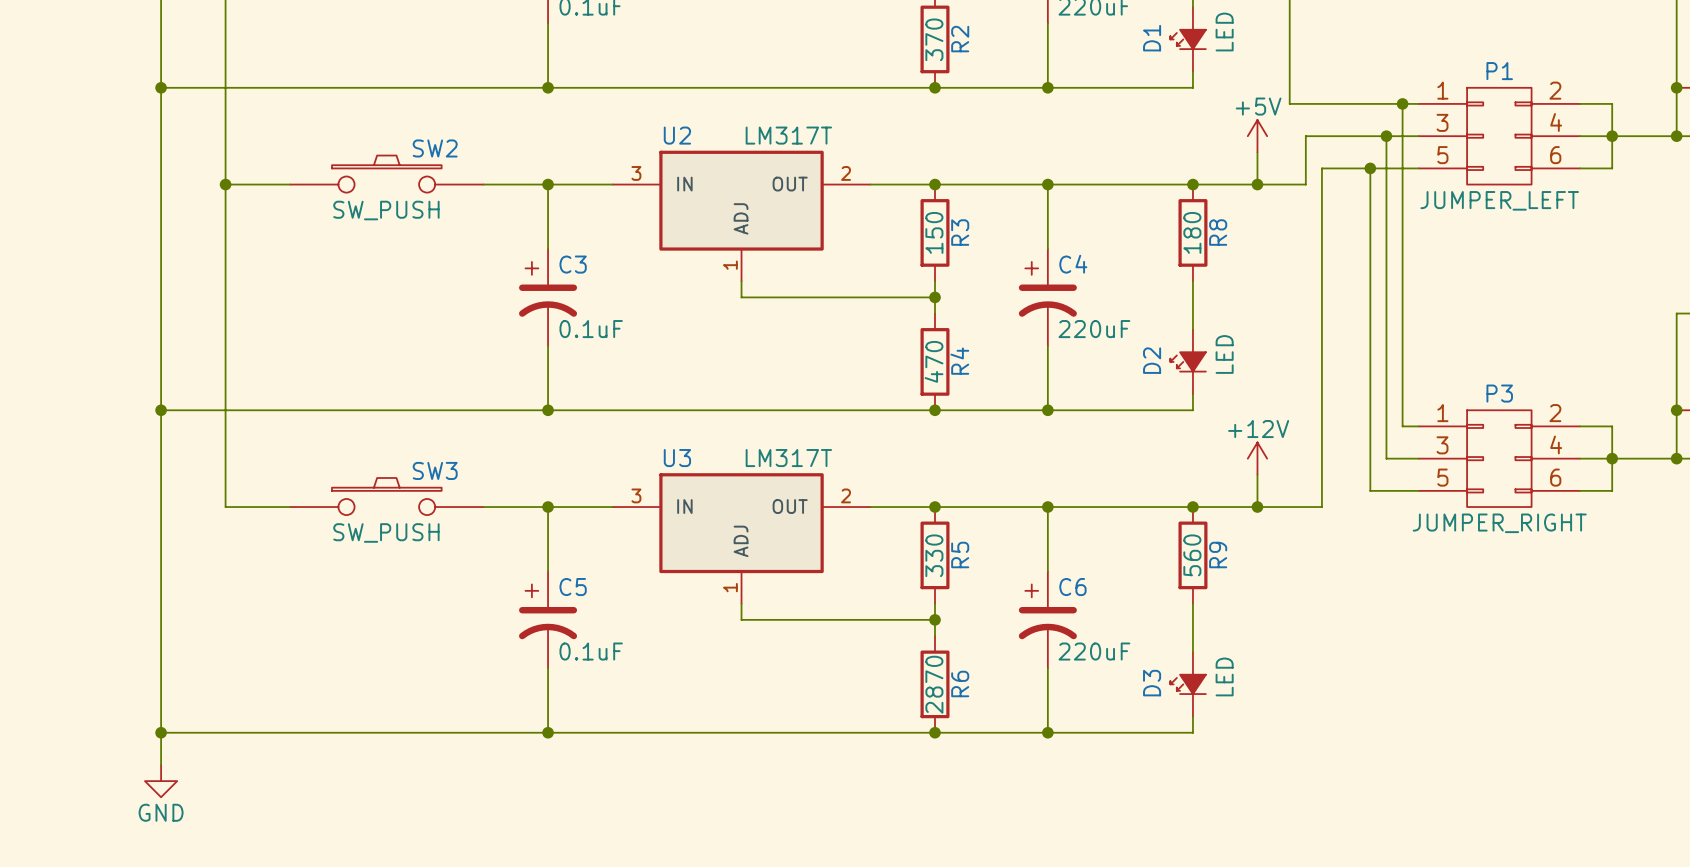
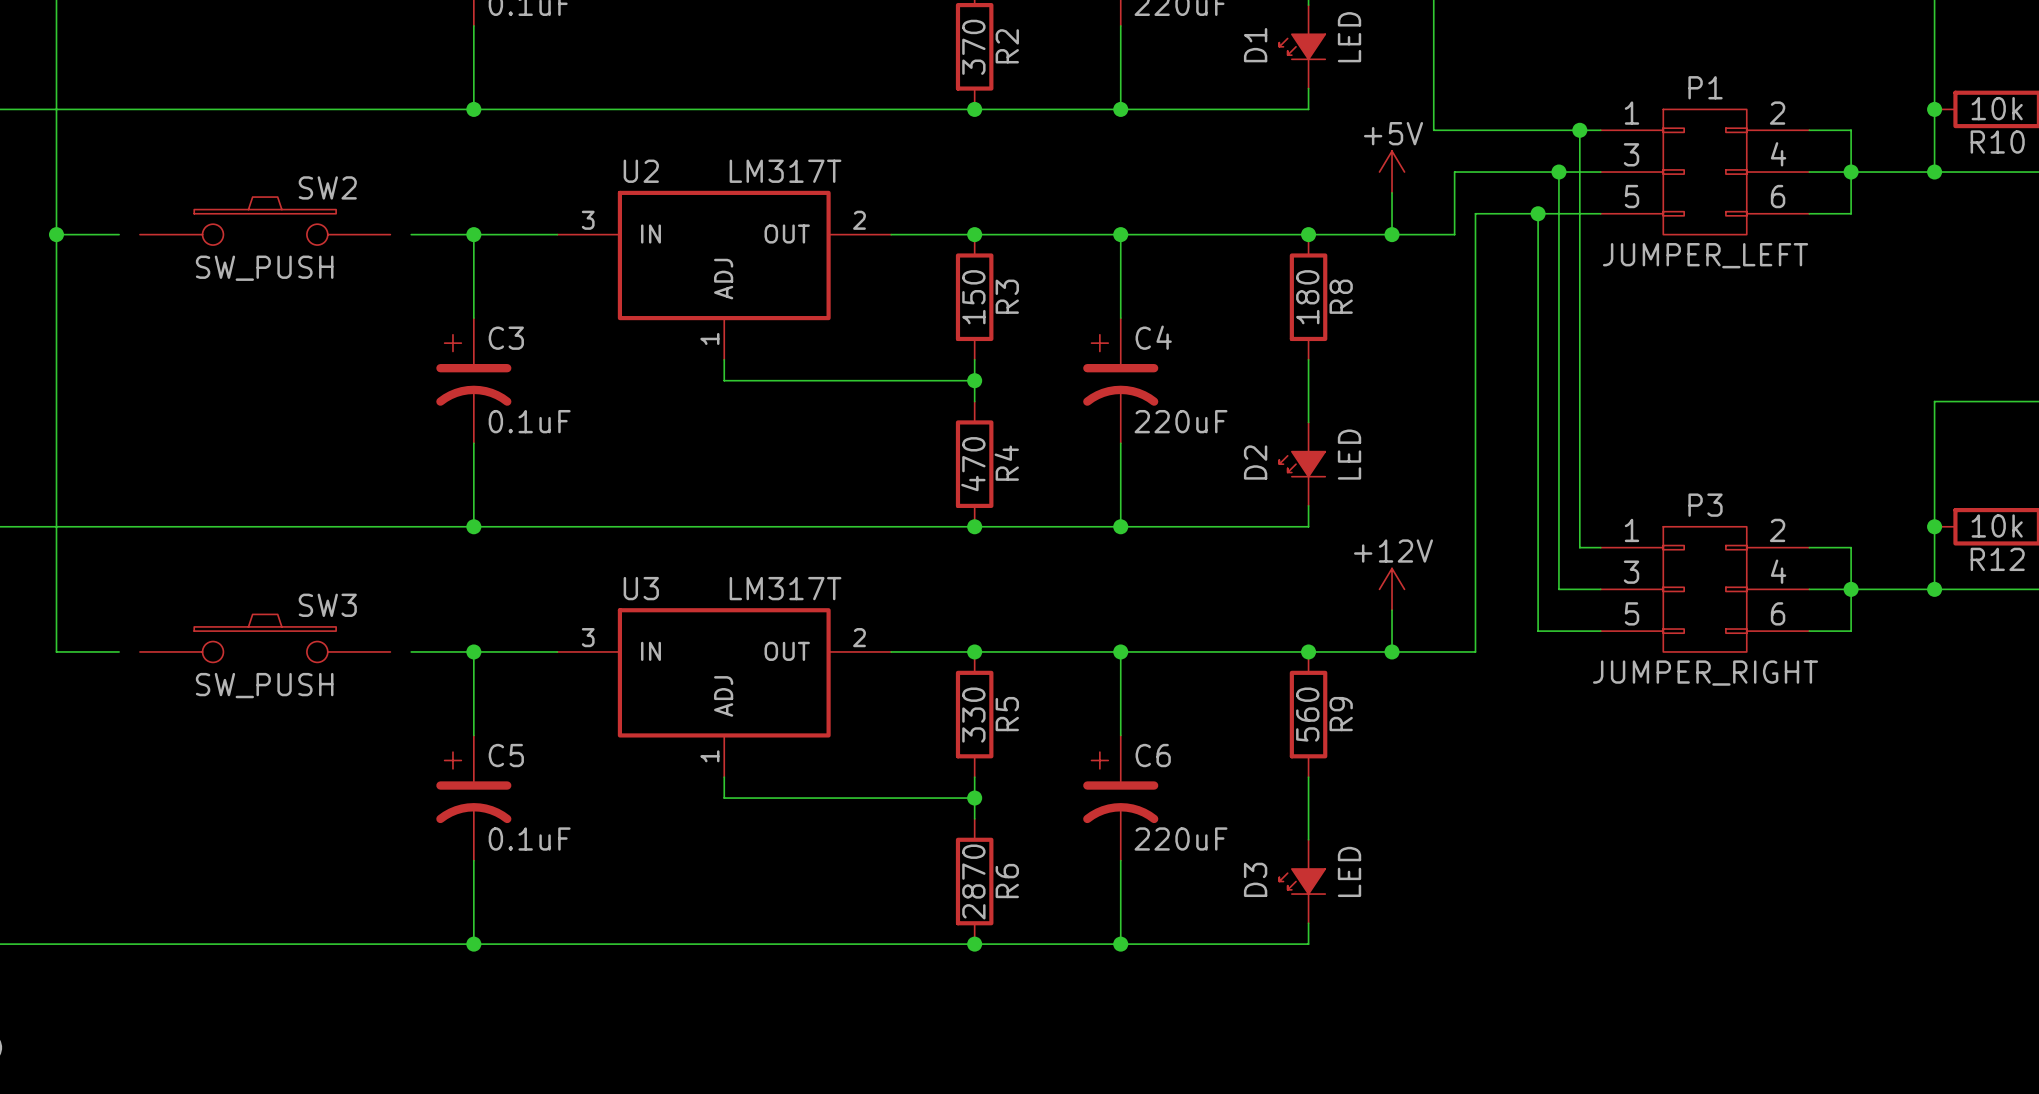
wire: (273, 184) (290, 184) -> none
wire: (483, 184) (499, 184) -> none
wire: (273, 507) (290, 507) -> none
wire: (483, 507) (499, 507) -> none

